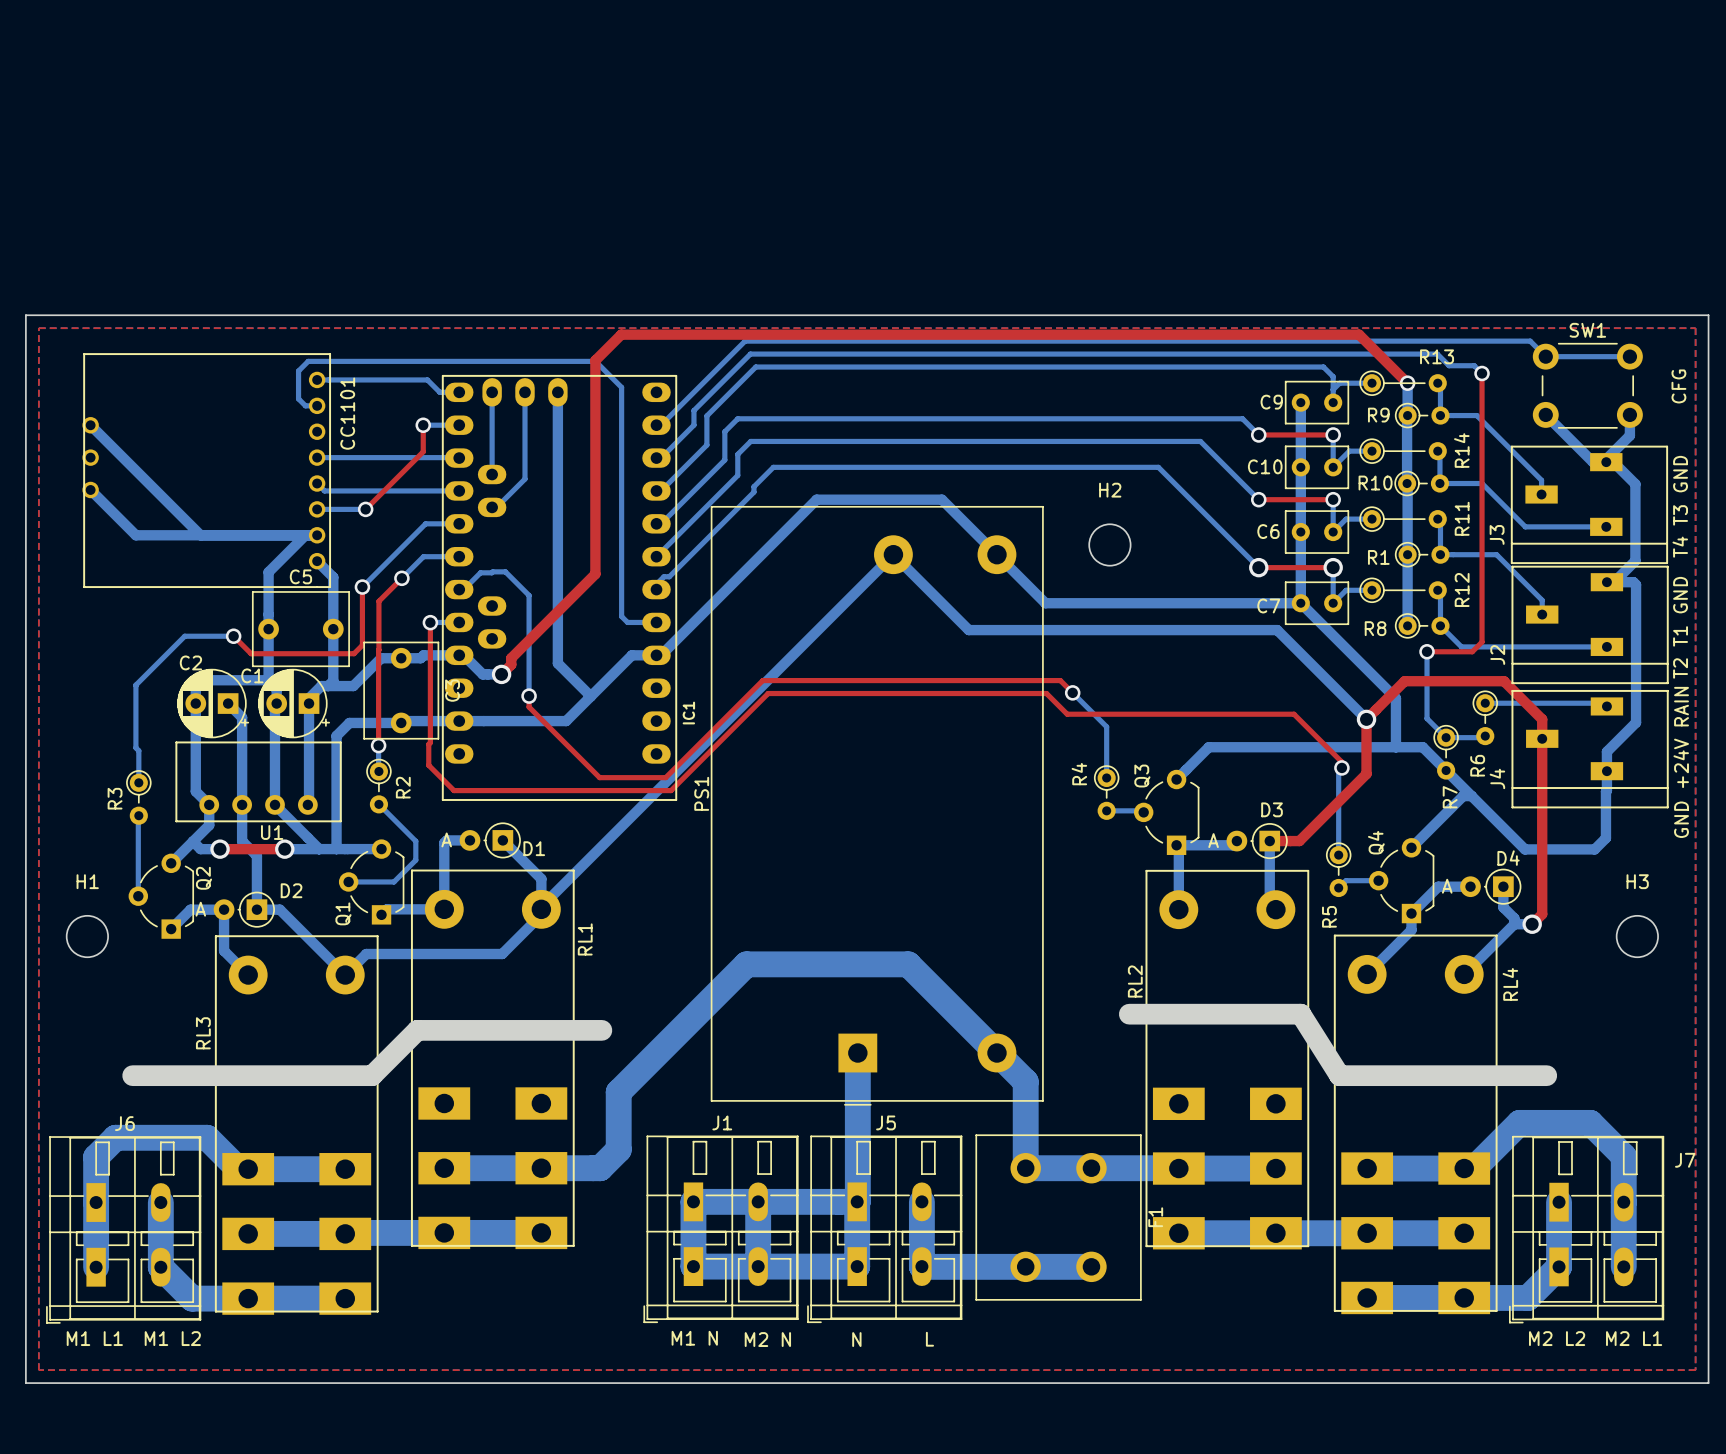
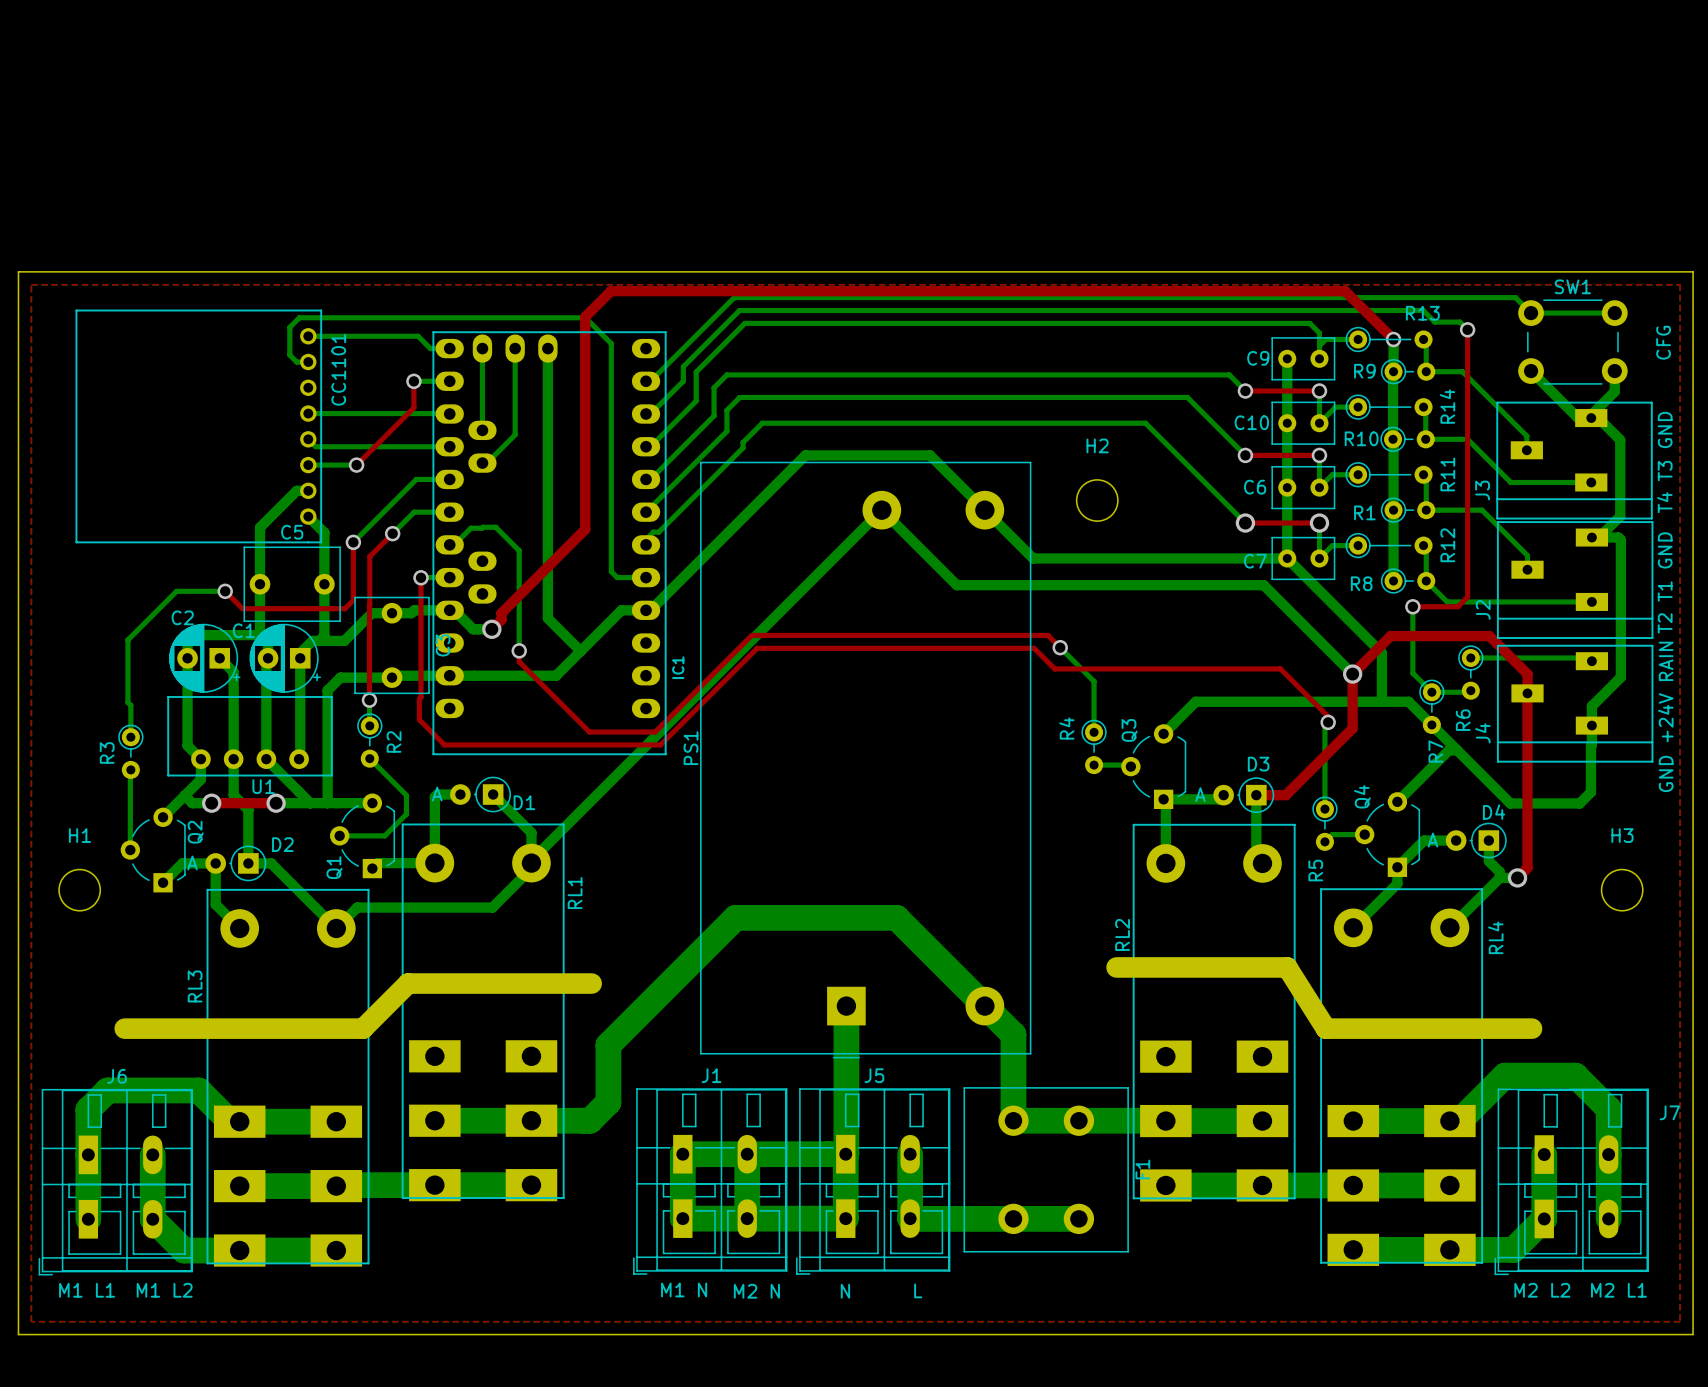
part footprint: [82, 353, 332, 589] -> [75, 309, 323, 544]
bottom track: (90, 425) (200, 535) -> none
bottom track: (90, 489) (135, 535) (305, 535) -> none

